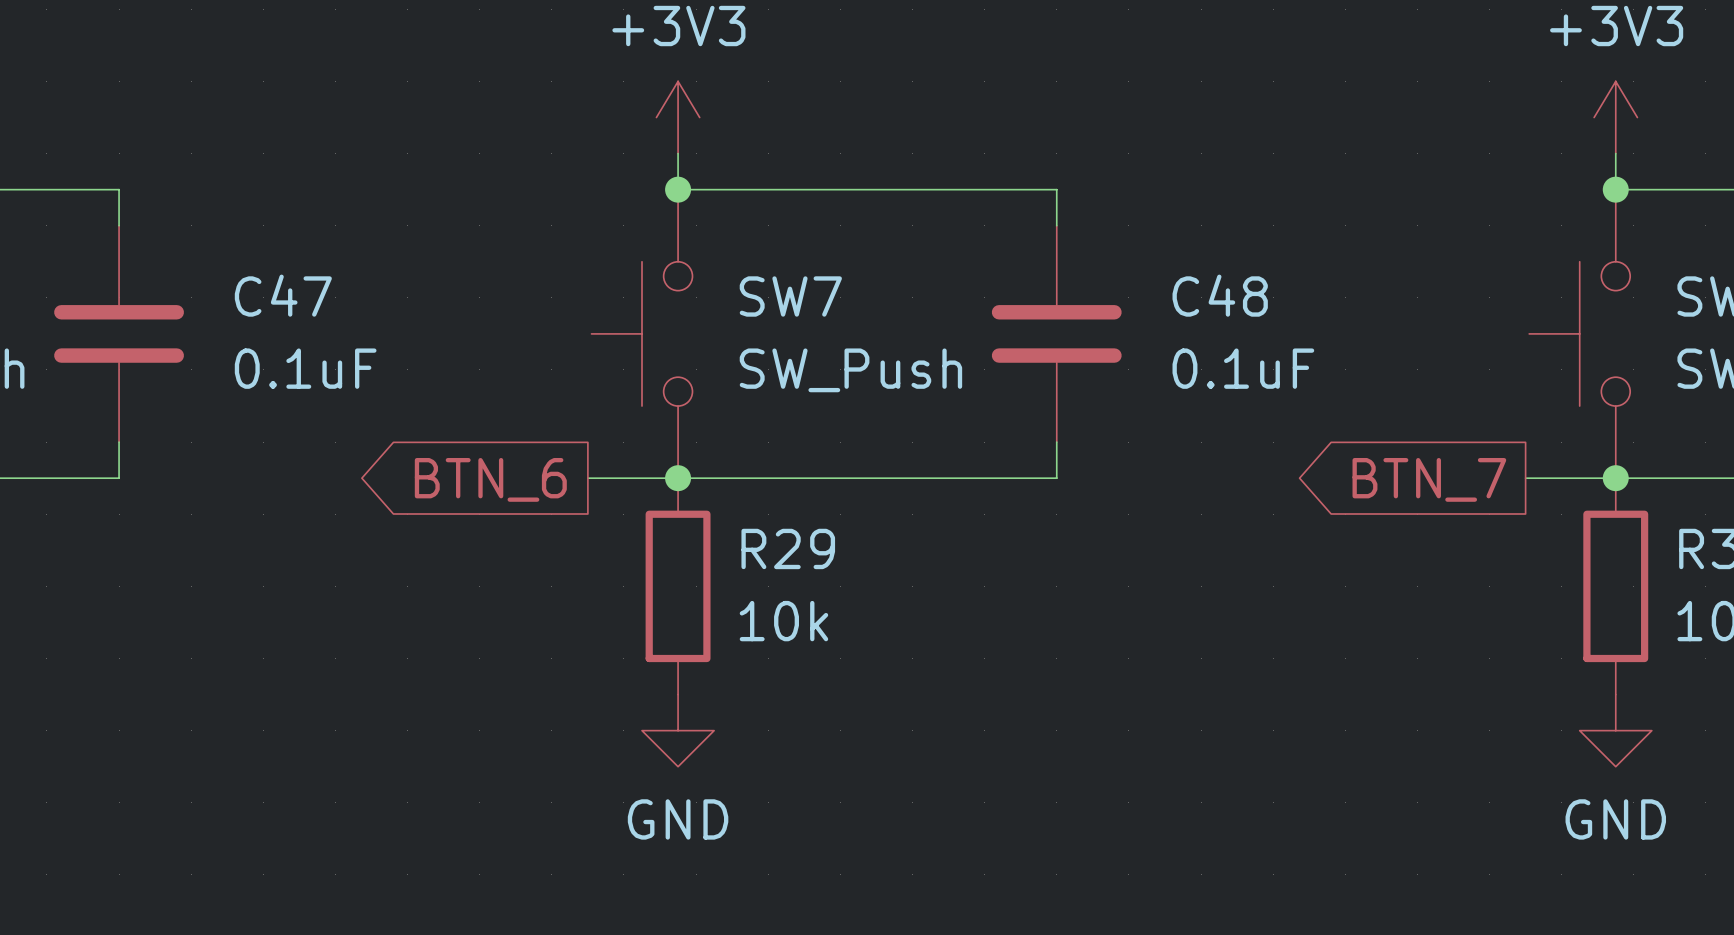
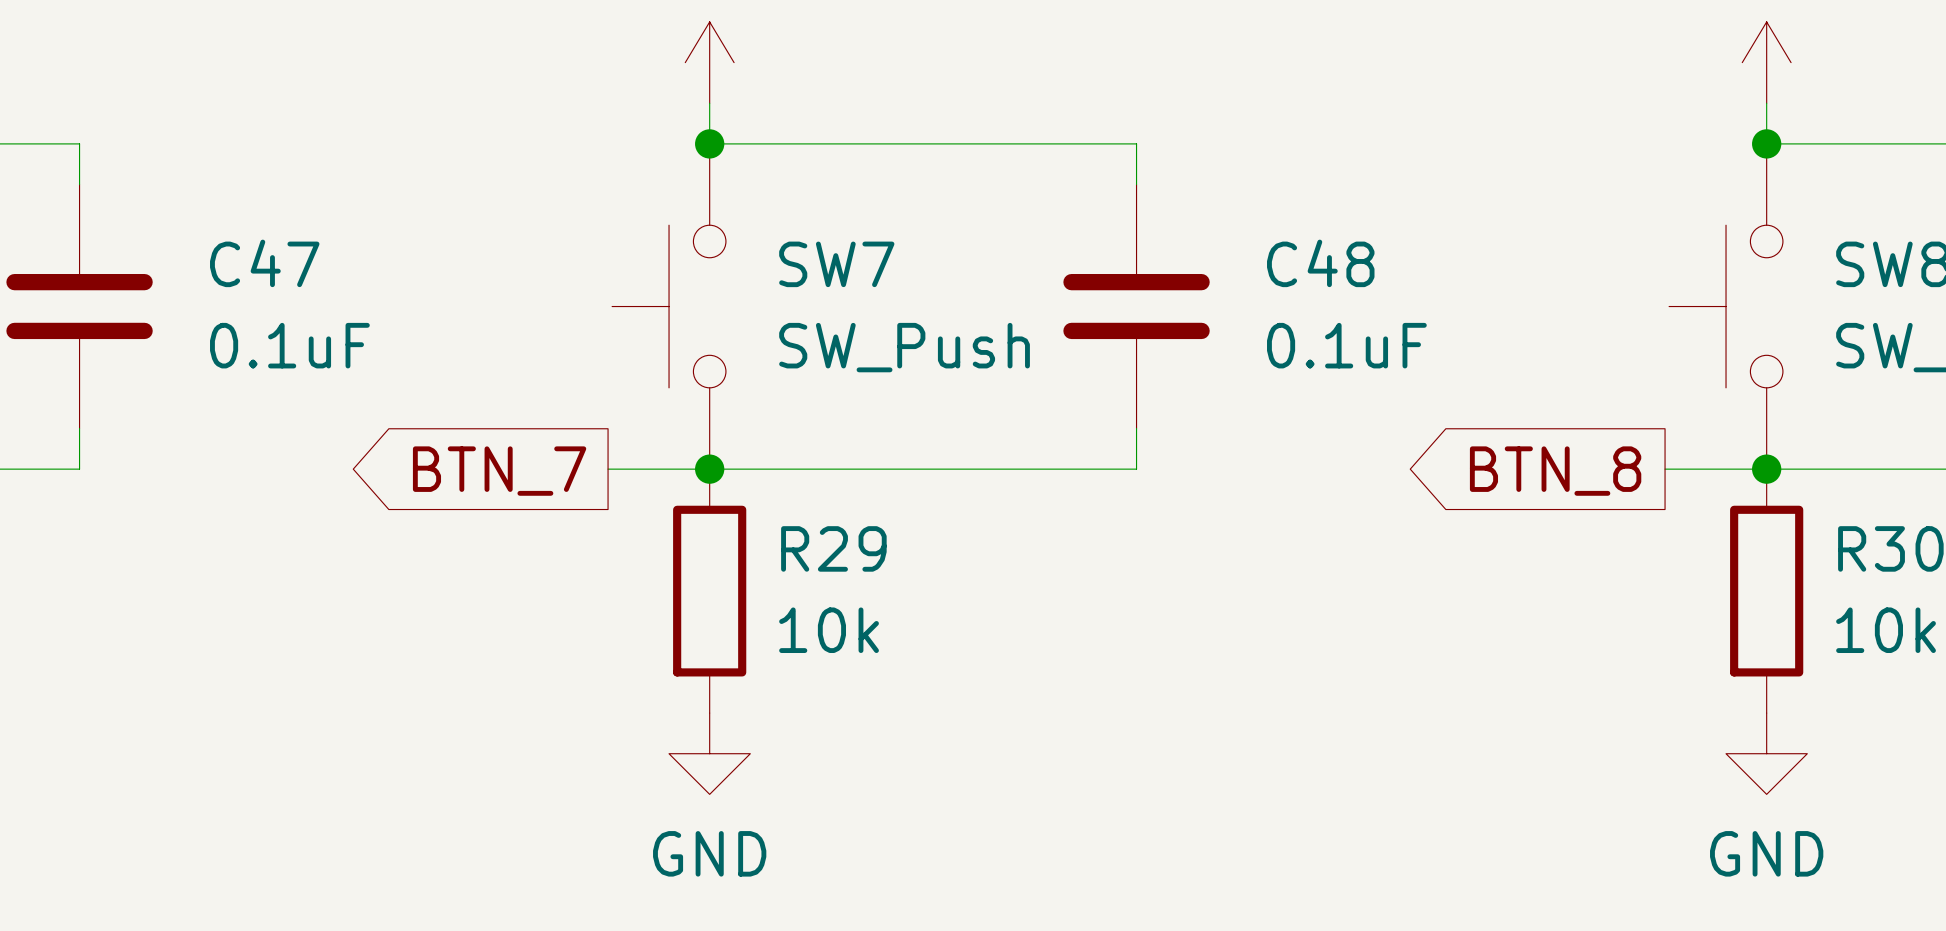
global label: BTN_6 (490, 479) -> BTN_7 (499, 471)
global label: BTN_7 (1429, 479) -> BTN_8 (1555, 471)

